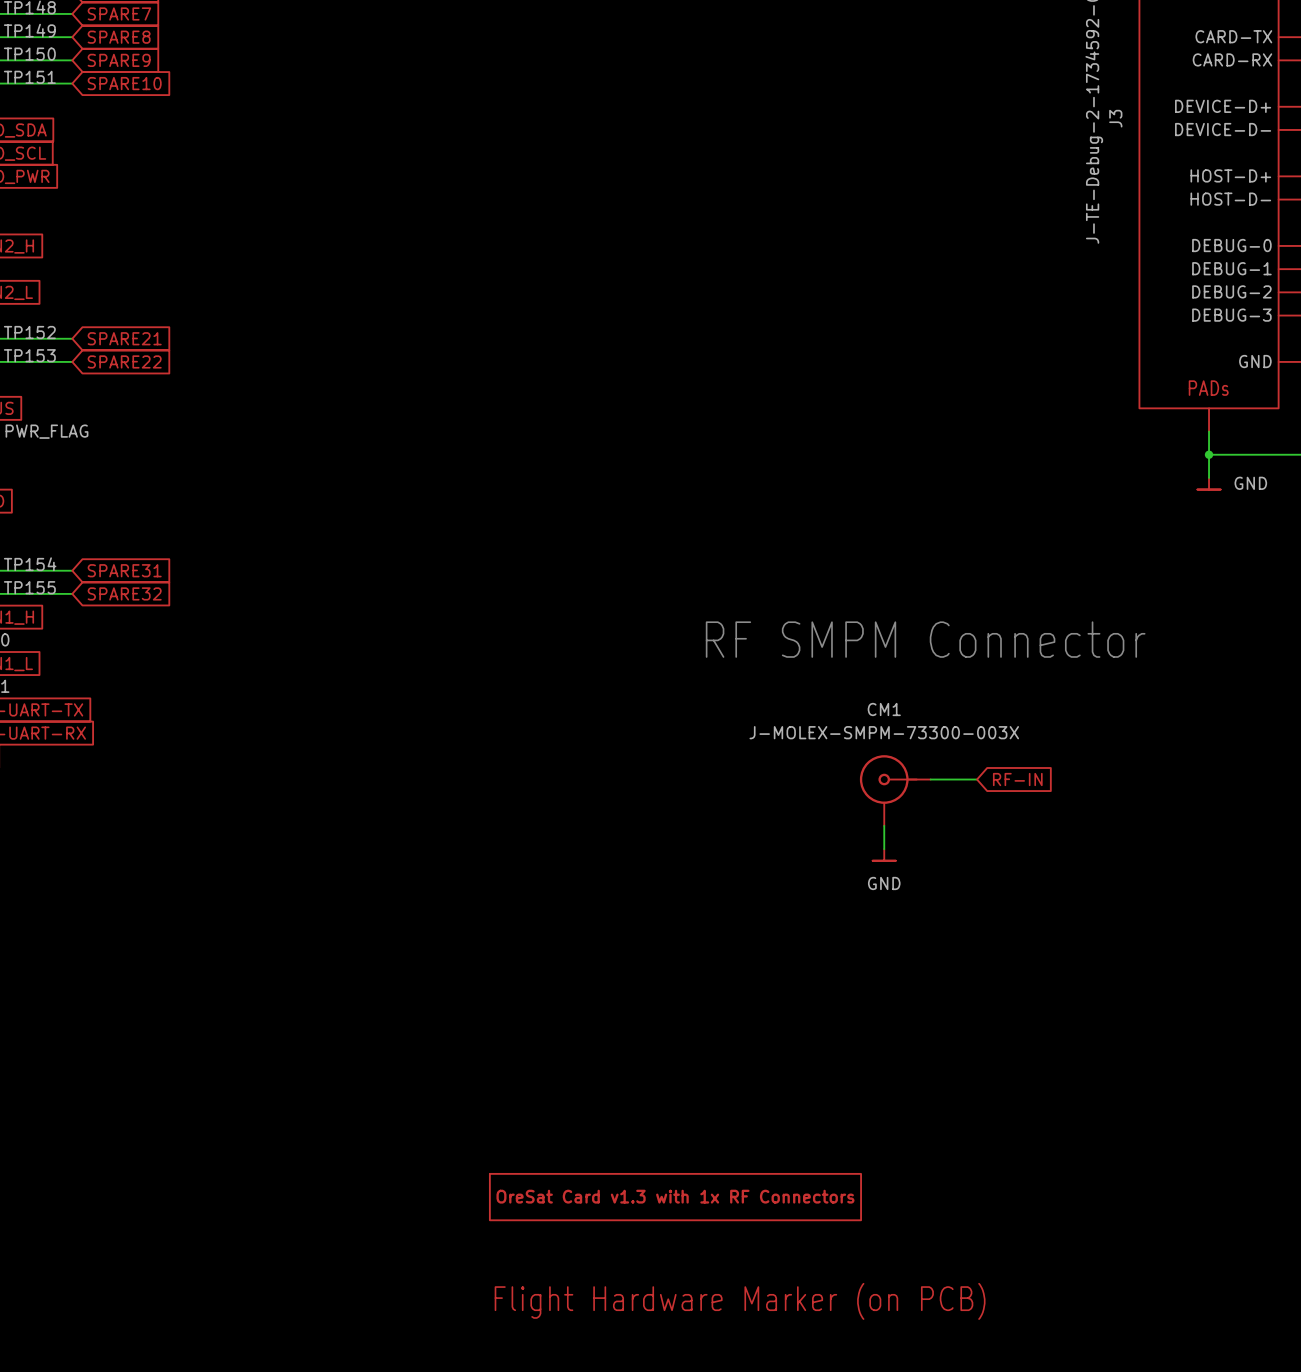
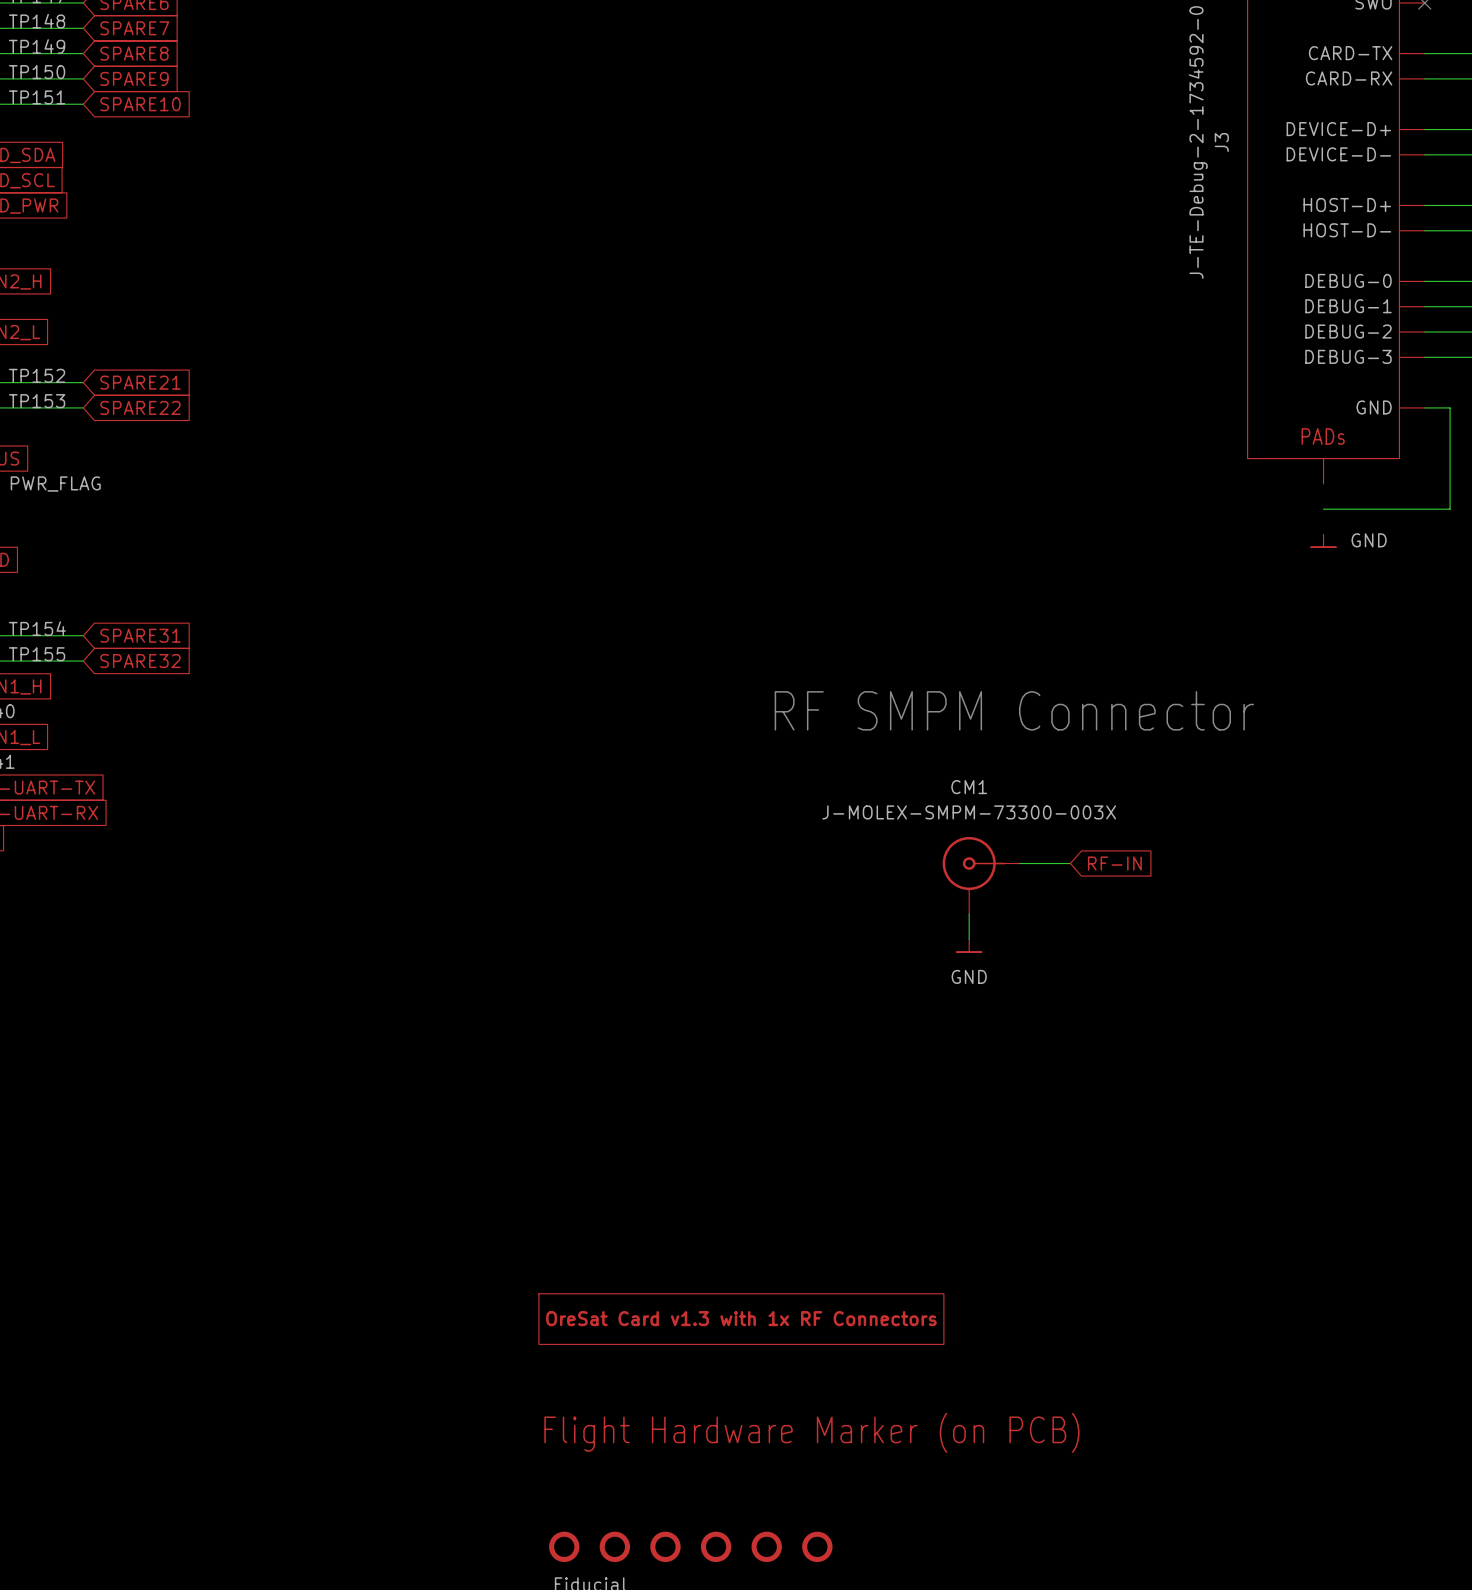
wire: (1209, 431) (1209, 477) -> none
junction: (1209, 454) -> none

